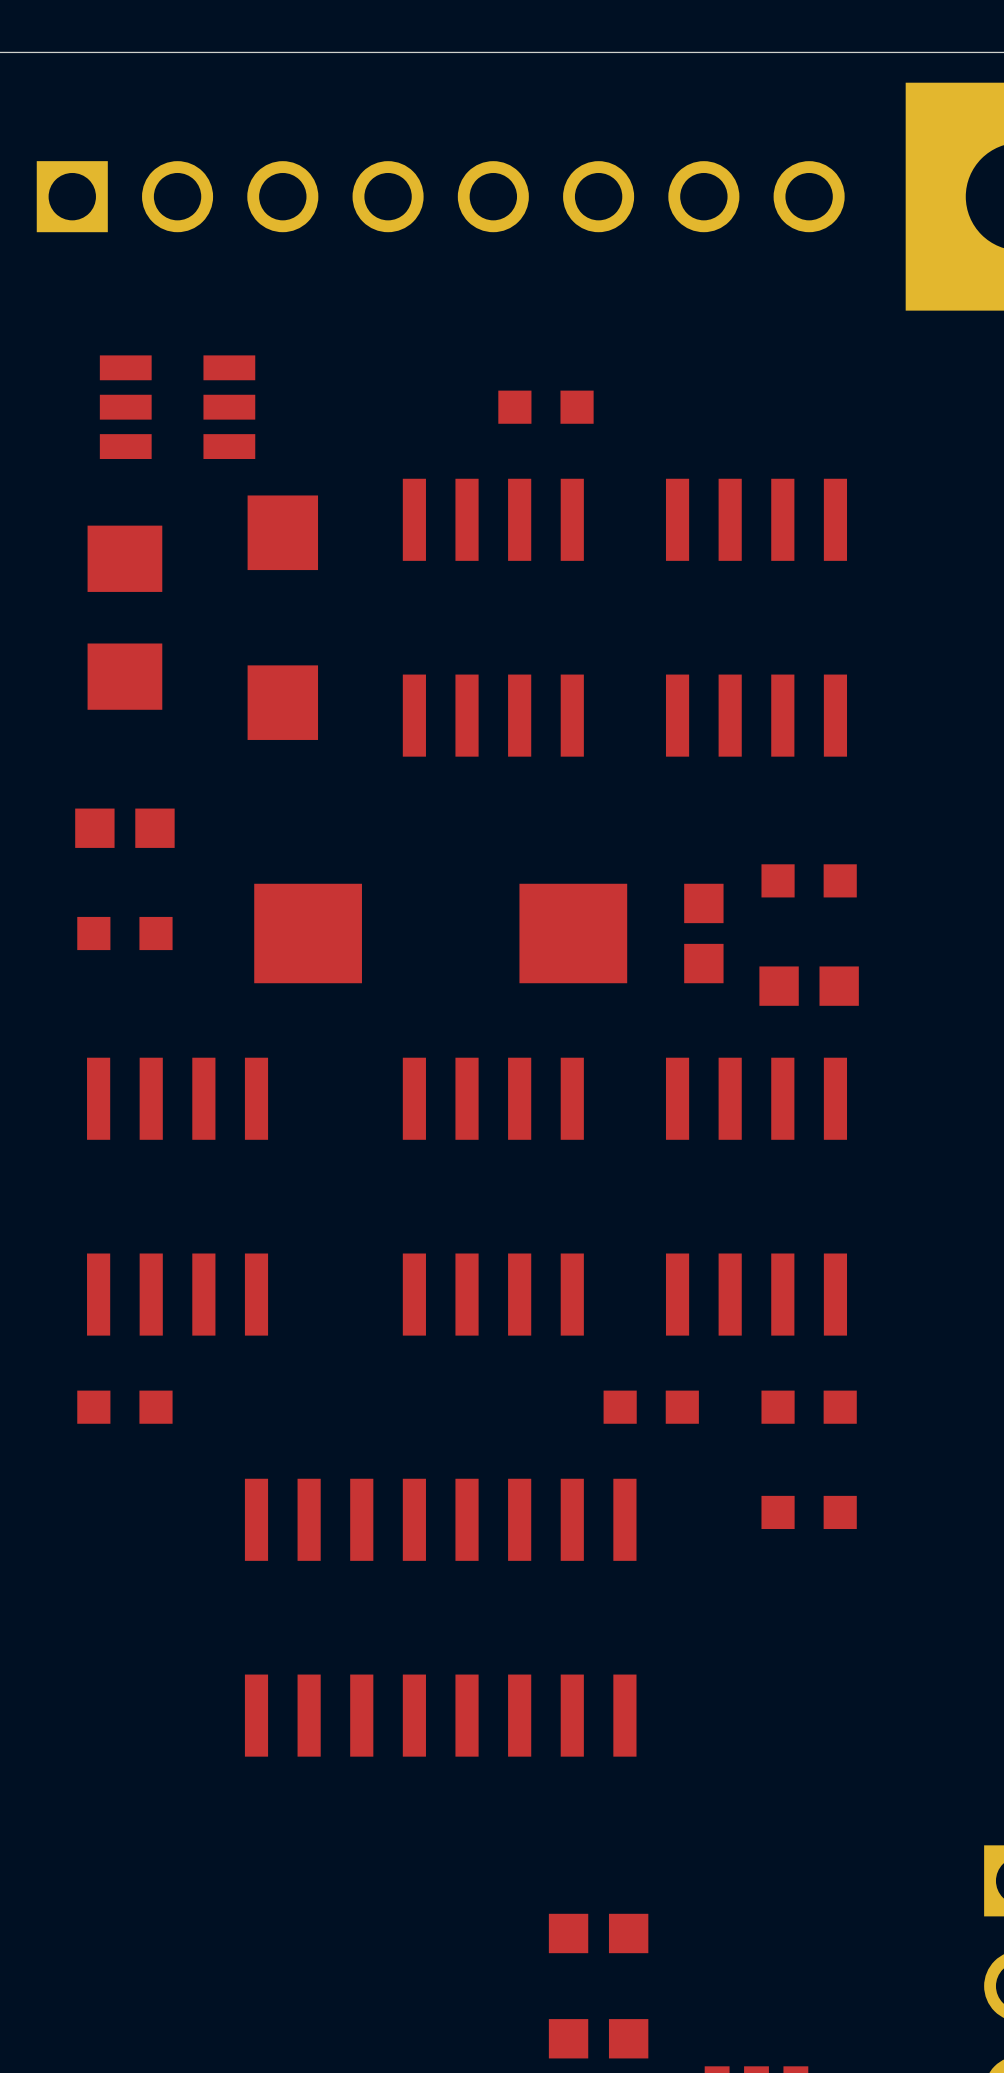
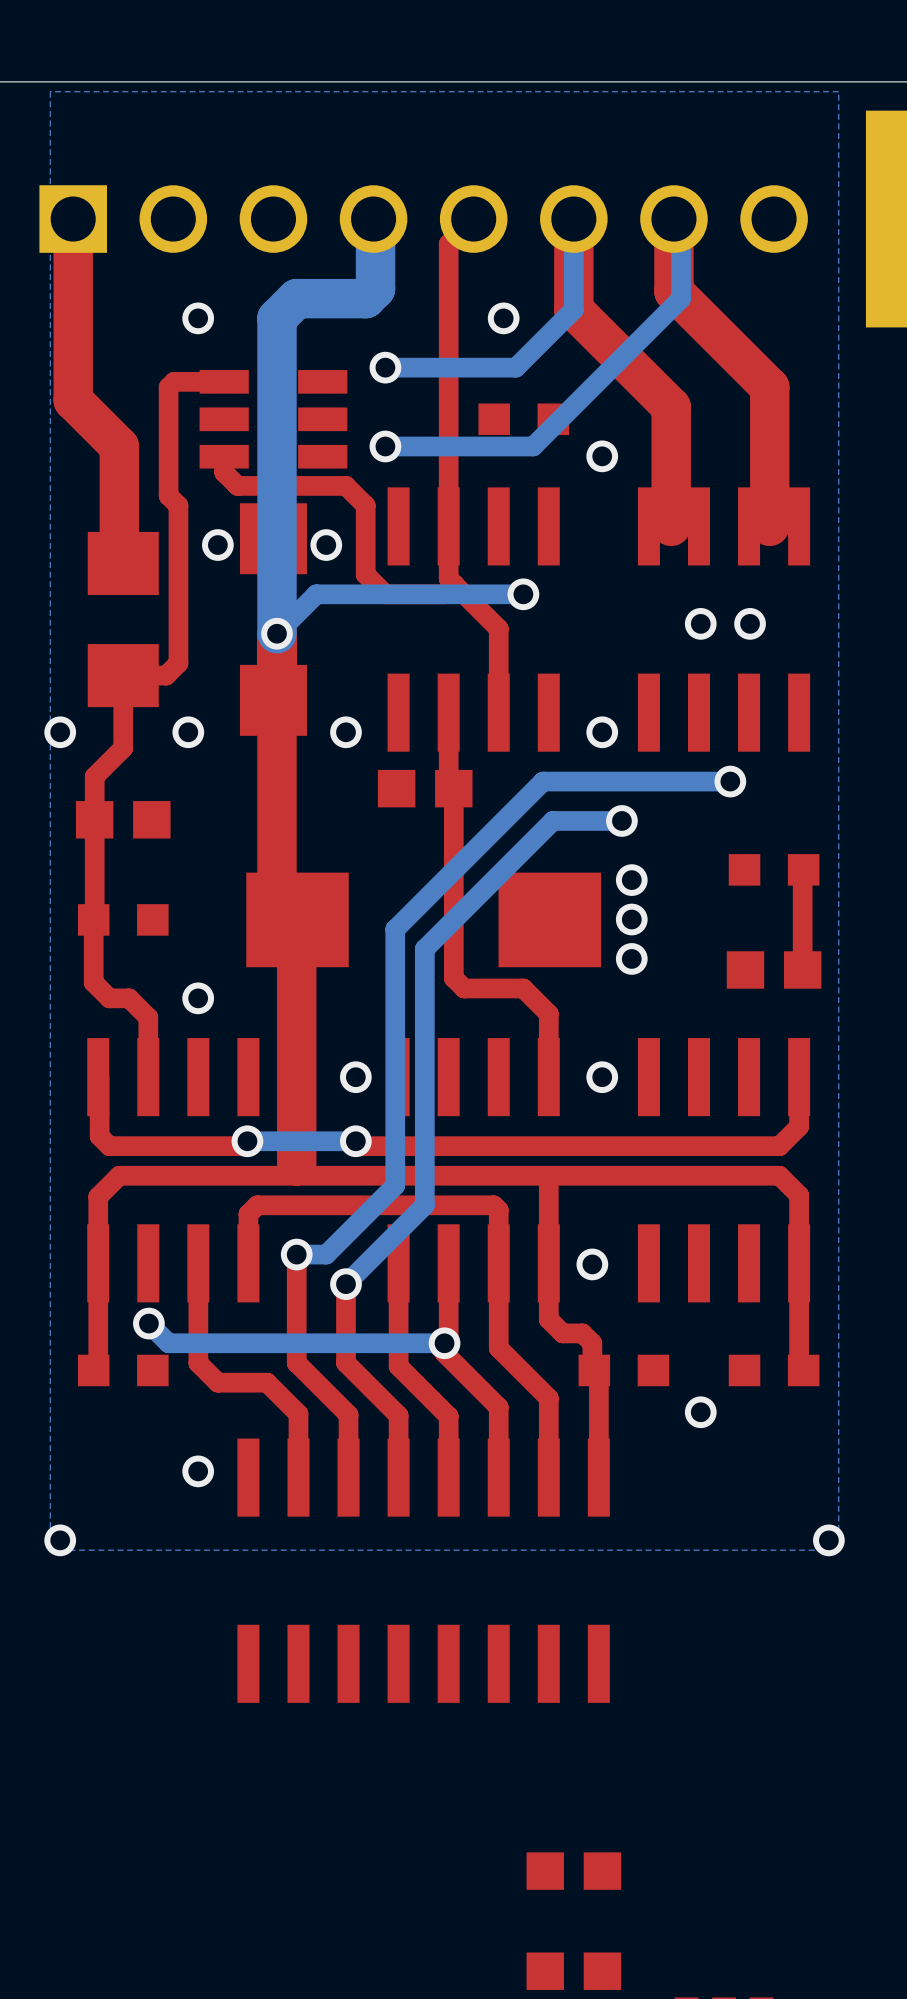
bottom zone outline: none -> (838, 91) (50, 91) (50, 1550) (838, 1550) (838, 91)
top track: none -> (73, 219) (73, 400) (119, 446) (119, 559) (123, 563)
bottom track: none -> (373, 219) (375, 219) (375, 288) (365, 298) (296, 298) (277, 318) (277, 633) (316, 594) (523, 594)
top track: none -> (473, 219) (448, 244) (448, 578) (498, 628) (498, 712)
top track: none -> (573, 219) (573, 309) (671, 407) (671, 526)
bottom track: none -> (573, 219) (573, 309) (515, 367) (385, 367)
top track: none -> (673, 219) (673, 291) (769, 387) (769, 526)
bottom track: none -> (673, 219) (681, 226) (681, 298) (533, 446) (385, 446)
via: none -> (198, 318)
via: none -> (503, 318)
via: none -> (385, 367)
top track: none -> (224, 381) (174, 381) (168, 387) (168, 495) (178, 505) (178, 663) (166, 675) (123, 675) (123, 748) (94, 776) (93, 982) (109, 998) (129, 998) (148, 1017) (148, 1077)
part position: (177, 407) -> (273, 419)
via: none -> (385, 446)
top track: none -> (224, 456) (224, 472) (237, 485) (345, 485) (365, 505) (365, 574) (385, 594) (444, 594) (454, 584)
via: none -> (602, 456)
via: none -> (217, 545)
via: none -> (326, 545)
via: none -> (523, 594)
via: none -> (700, 623)
via: none -> (750, 623)
top track: none -> (277, 633) (277, 909) (296, 929)
via: none -> (277, 633)
top track: none -> (448, 712) (448, 783) (453, 788) (453, 978) (464, 988) (523, 988) (548, 1013) (548, 1077)
via: none -> (60, 732)
via: none -> (188, 732)
via: none -> (345, 732)
via: none -> (602, 732)
bottom track: none -> (730, 781) (543, 781) (395, 929) (395, 1185) (326, 1254) (296, 1254)
via: none -> (730, 781)
bottom track: none -> (621, 820) (552, 820) (424, 949) (424, 1205) (345, 1284)
via: none -> (621, 820)
top track: none -> (803, 869) (802, 969)
via: none -> (631, 880)
top track: none -> (297, 919) (296, 1175)
via: none -> (631, 919)
part rotation: 0° (703, 933) -> 90° clockwise (425, 788)
part position: (703, 933) -> (425, 788)
via: none -> (631, 958)
via: none -> (198, 998)
top track: none -> (99, 1077) (99, 1136) (109, 1146) (242, 1146) (247, 1141)
via: none -> (355, 1077)
via: none -> (602, 1077)
top track: none -> (799, 1077) (799, 1126) (779, 1146) (360, 1146) (355, 1141)
via: none -> (247, 1141)
bottom track: none -> (355, 1141) (247, 1141)
via: none -> (355, 1141)
top track: none -> (543, 1175) (548, 1181) (548, 1319) (562, 1333) (582, 1333) (592, 1343) (592, 1368) (598, 1375) (598, 1477)
top track: none -> (296, 1254) (296, 1362) (348, 1414) (348, 1477)
via: none -> (296, 1254)
top track: none -> (198, 1263) (198, 1363) (217, 1382) (267, 1382) (298, 1414) (298, 1477)
top track: none -> (248, 1263) (248, 1214) (257, 1205) (493, 1205) (498, 1210) (498, 1348) (548, 1398) (548, 1477)
top track: none -> (398, 1263) (398, 1366) (448, 1416) (448, 1477)
top track: none -> (448, 1263) (448, 1339) (444, 1343) (444, 1353) (498, 1407) (498, 1477)
via: none -> (592, 1264)
top track: none -> (345, 1284) (345, 1362) (398, 1415) (398, 1477)
via: none -> (345, 1284)
bottom track: none -> (148, 1323) (168, 1343) (444, 1343)
via: none -> (148, 1323)
via: none -> (444, 1343)
top track: none -> (803, 1370) (799, 1365) (799, 1195) (779, 1175) (119, 1175) (98, 1196) (98, 1365) (93, 1370)
via: none -> (700, 1412)
part: (809, 1512) -> none
via: none -> (198, 1471)
via: none -> (60, 1540)
via: none -> (828, 1540)

